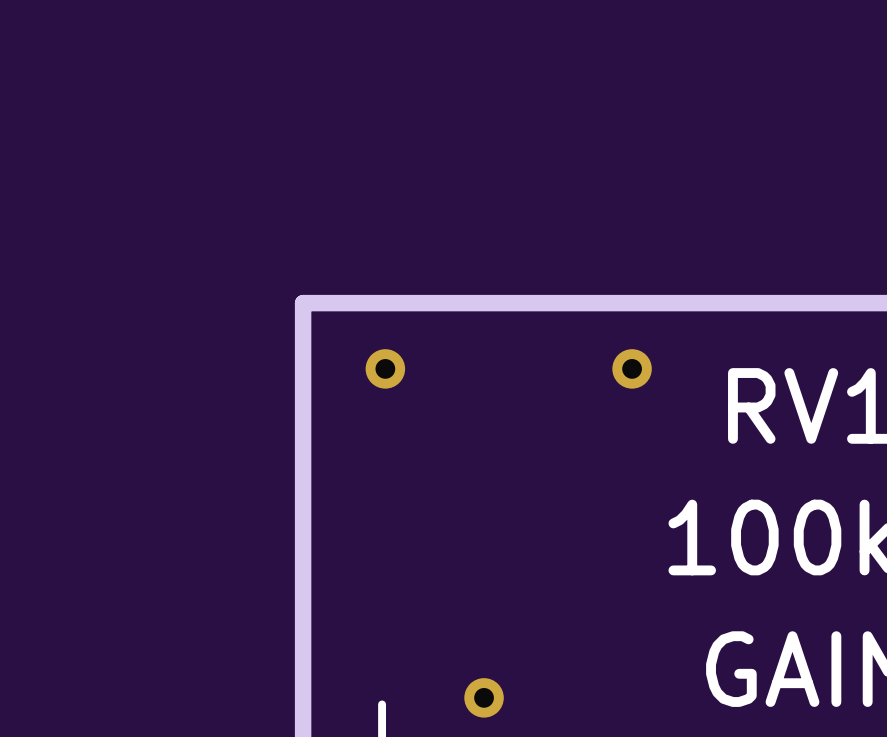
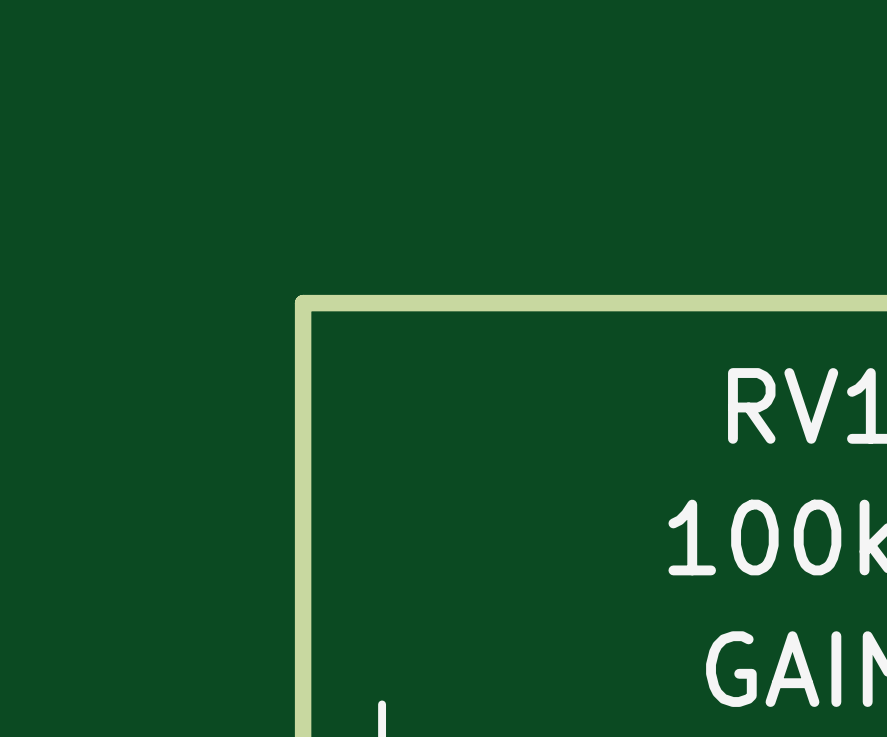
via: (385, 368) -> none
via: (632, 368) -> none
via: (484, 697) -> none

